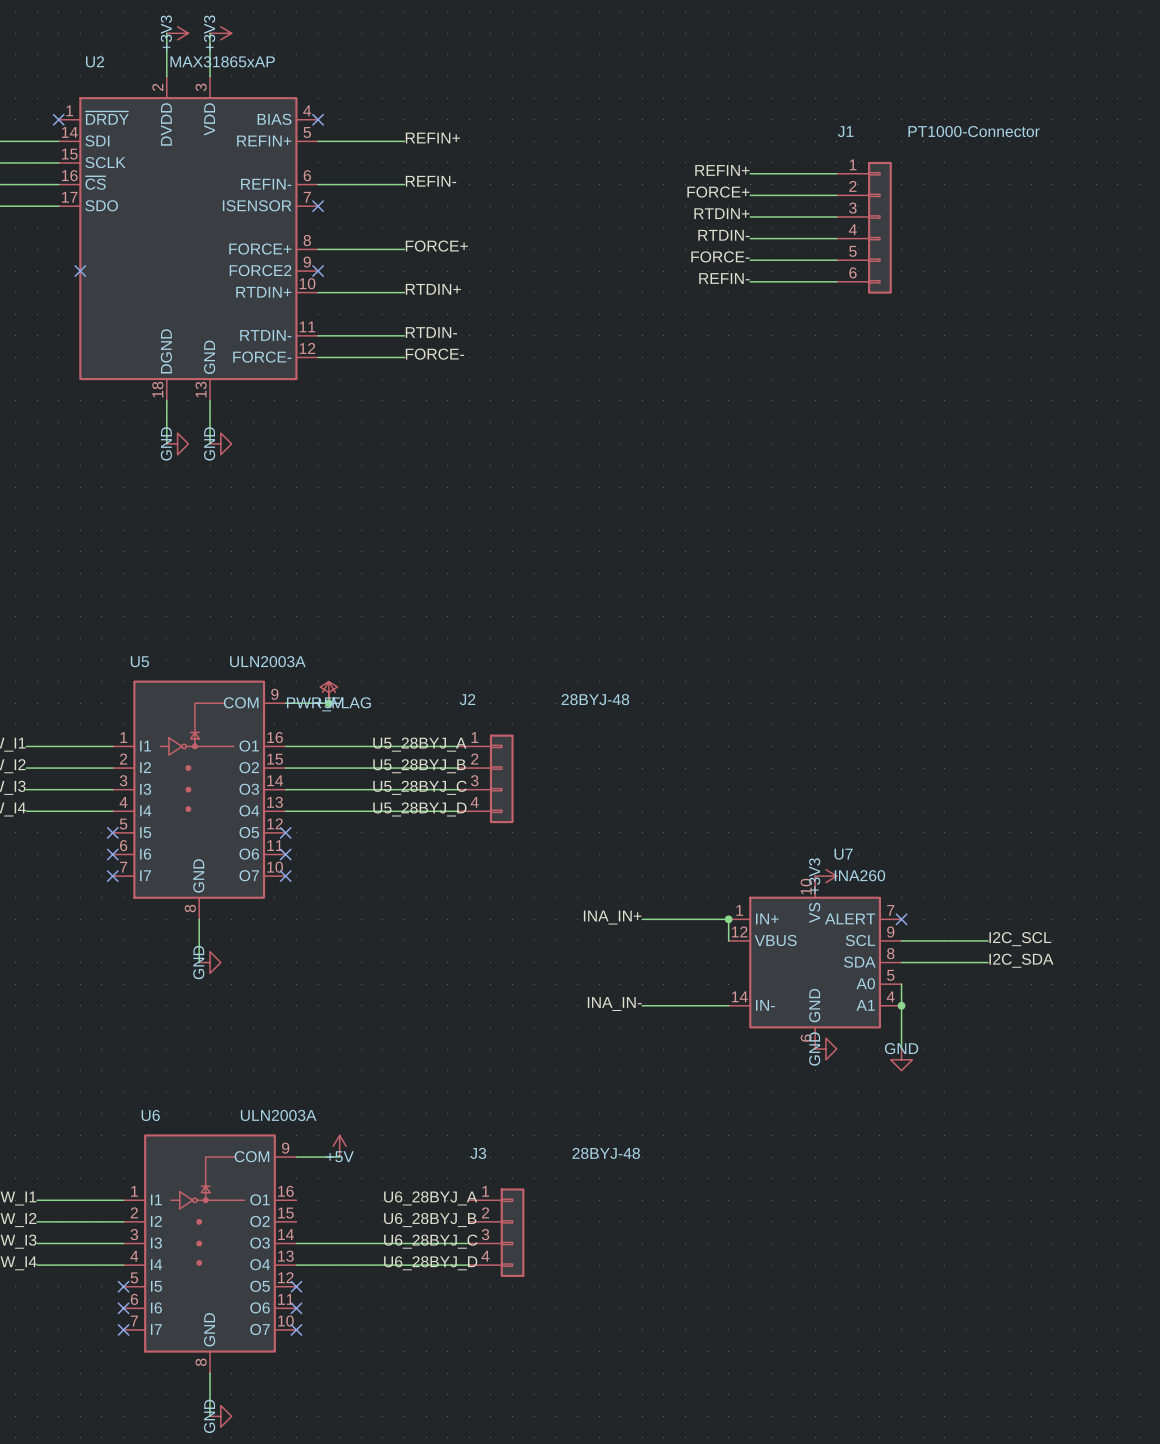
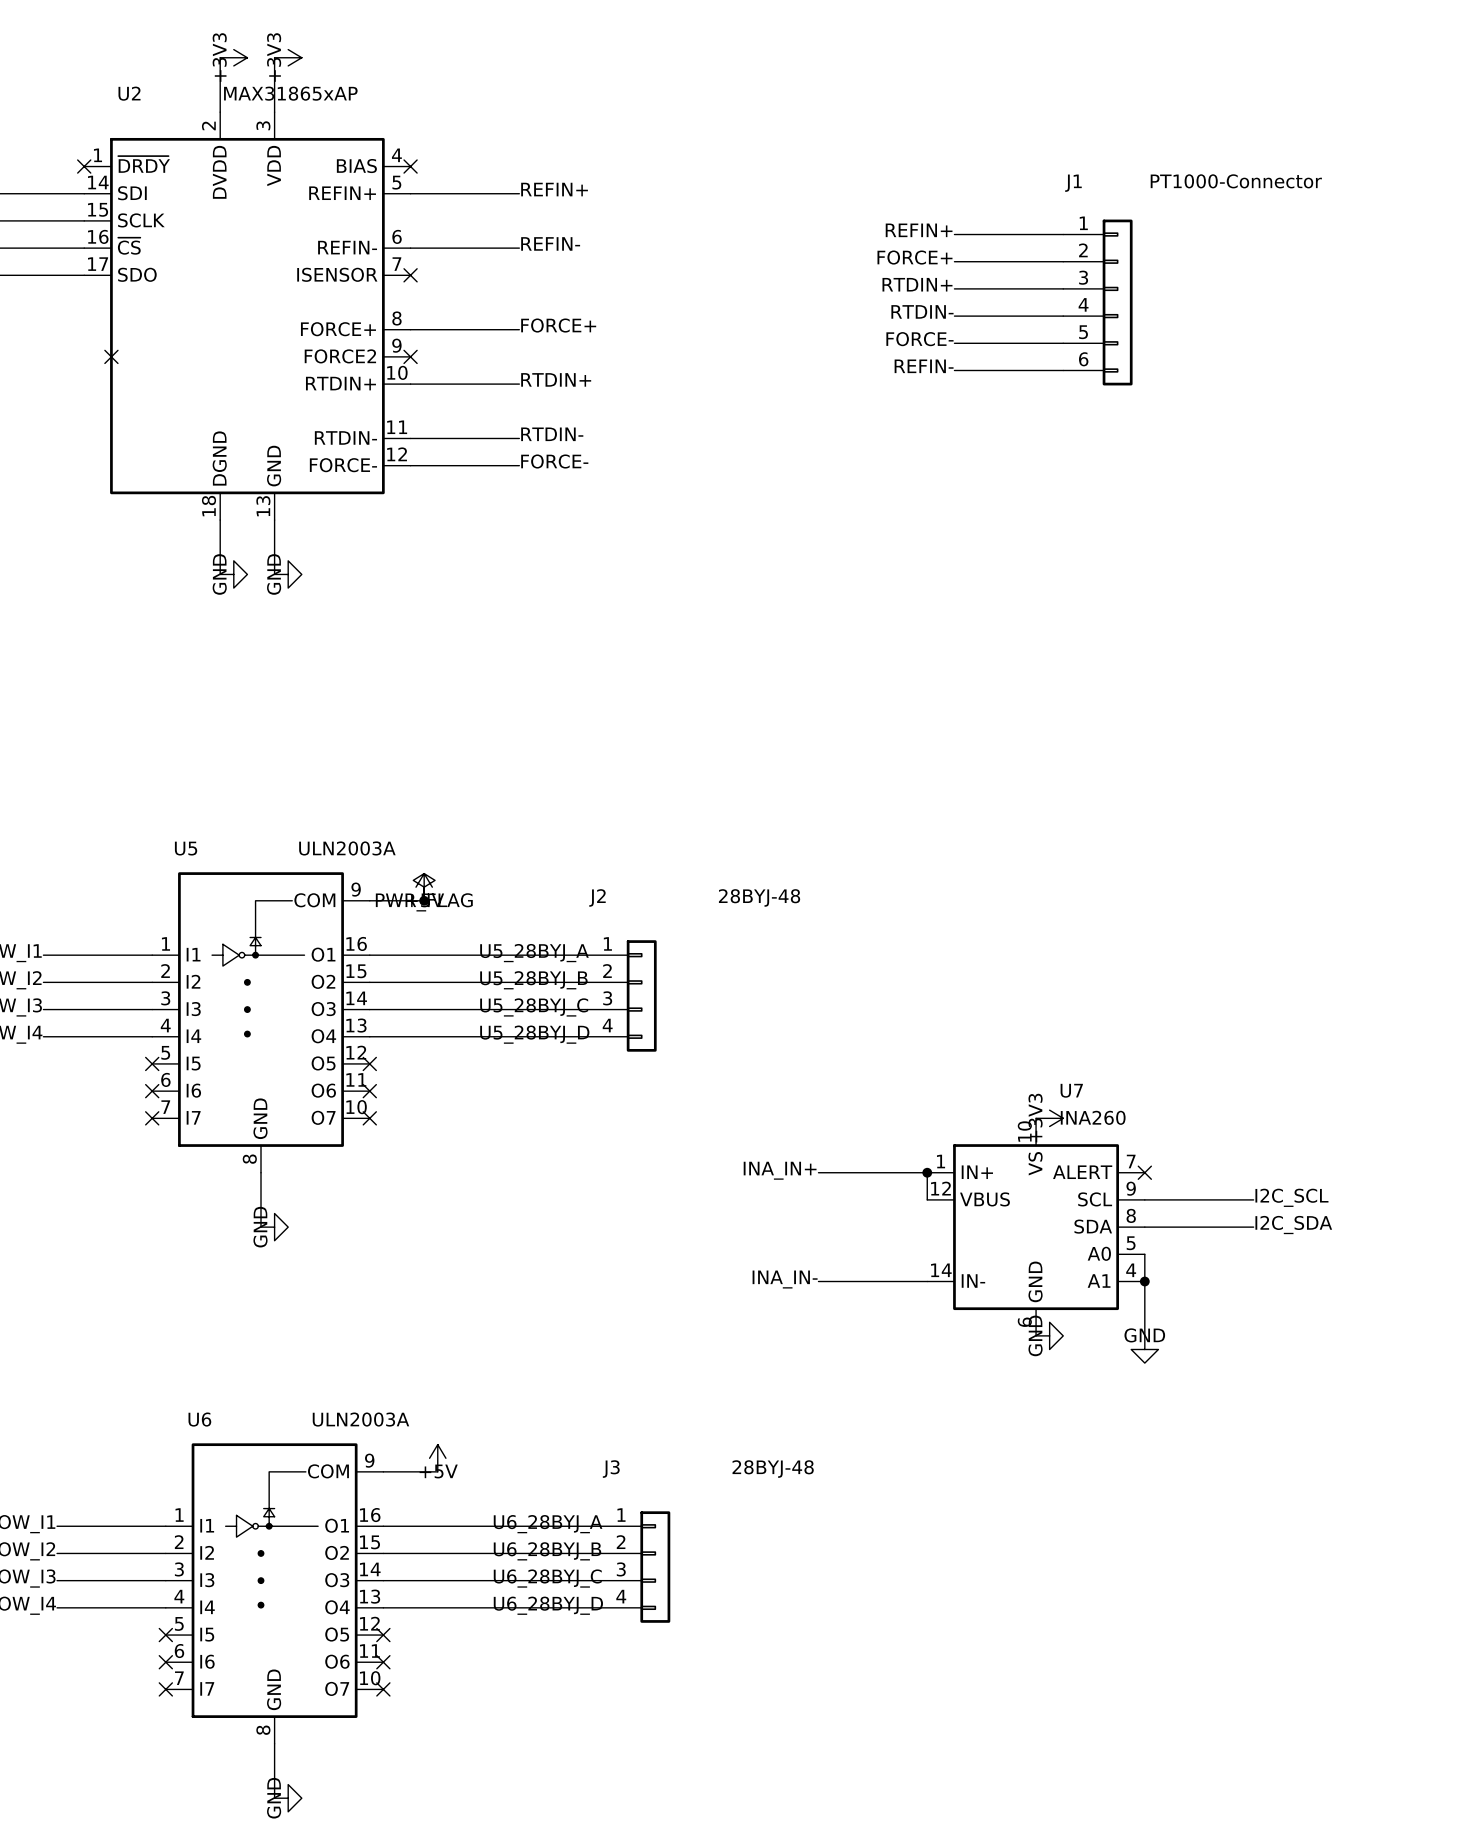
wire: none -> (383, 1526) (600, 1526)
wire: none -> (383, 1553) (600, 1553)

